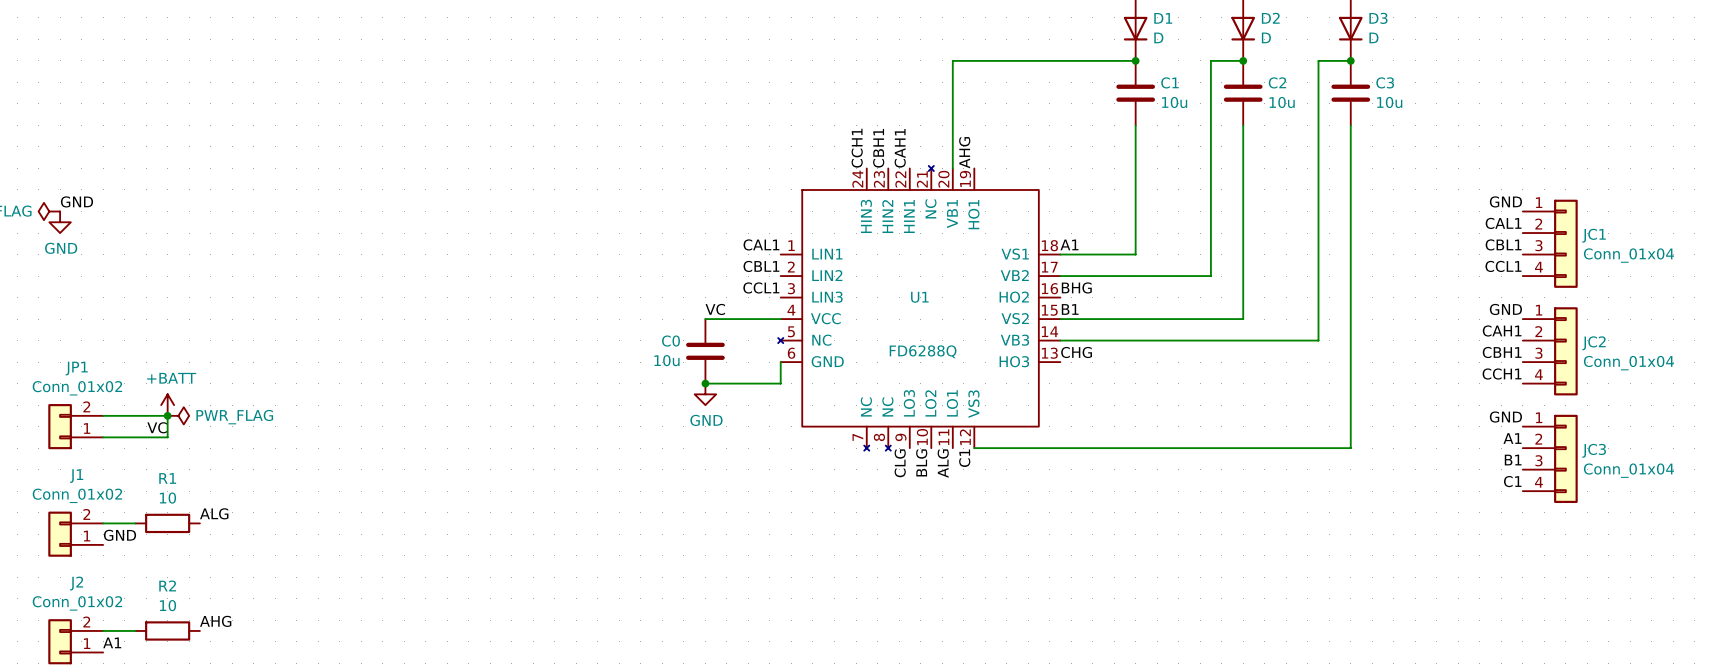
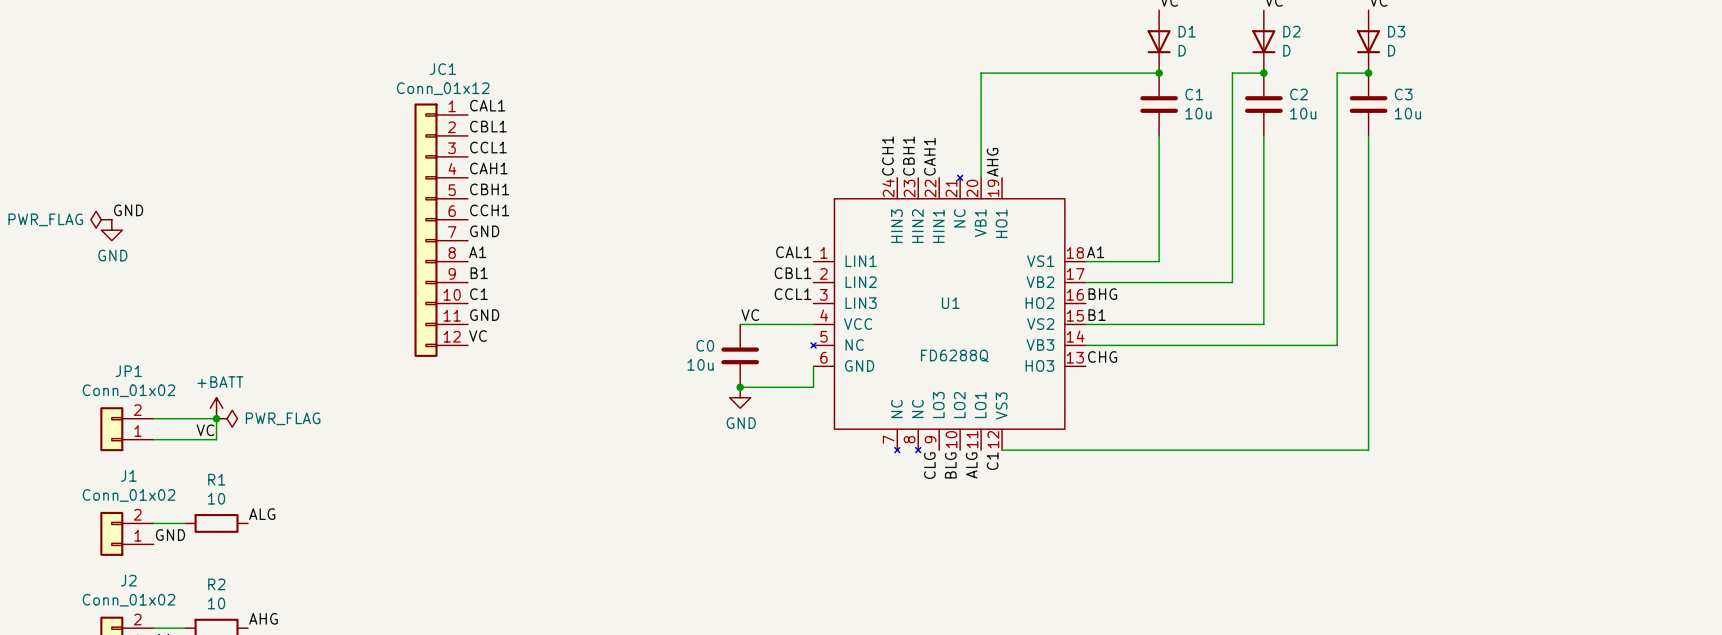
label: none -> CAL1 (487, 105)
label: none -> CBL1 (488, 126)
label: none -> CCL1 (488, 147)
label: none -> CAH1 (488, 168)
label: none -> CBH1 (489, 189)
JC1 symbol: [1522, 199, 1578, 288] -> [414, 103, 468, 357]
label: none -> CCH1 (489, 210)
label: GND (1505, 201) -> none
label: none -> GND (484, 231)
label: CAL1 (1503, 223) -> none
JC1 name position: JC1 (1594, 235) -> JC1 (442, 69)
label: none -> A1 (477, 252)
label: CBL1 (1503, 244) -> none
JC1 value: Conn_01x04 (1628, 255) -> Conn_01x12 (443, 88)
label: none -> B1 (479, 273)
label: CCL1 (1503, 266) -> none
label: none -> C1 (478, 294)
label: none -> GND (484, 315)
label: GND (1505, 309) -> none
label: none -> VC (477, 336)
label: CAH1 (1502, 330) -> none
JC2: Conn_01x04 (1550, 351) -> none
label: CBH1 (1502, 352) -> none
label: CCH1 (1502, 374) -> none
label: GND (1505, 417) -> none
label: A1 (1512, 438) -> none
JC3: Conn_01x04 (1550, 458) -> none
label: B1 (1513, 460) -> none
label: C1 (1512, 481) -> none

